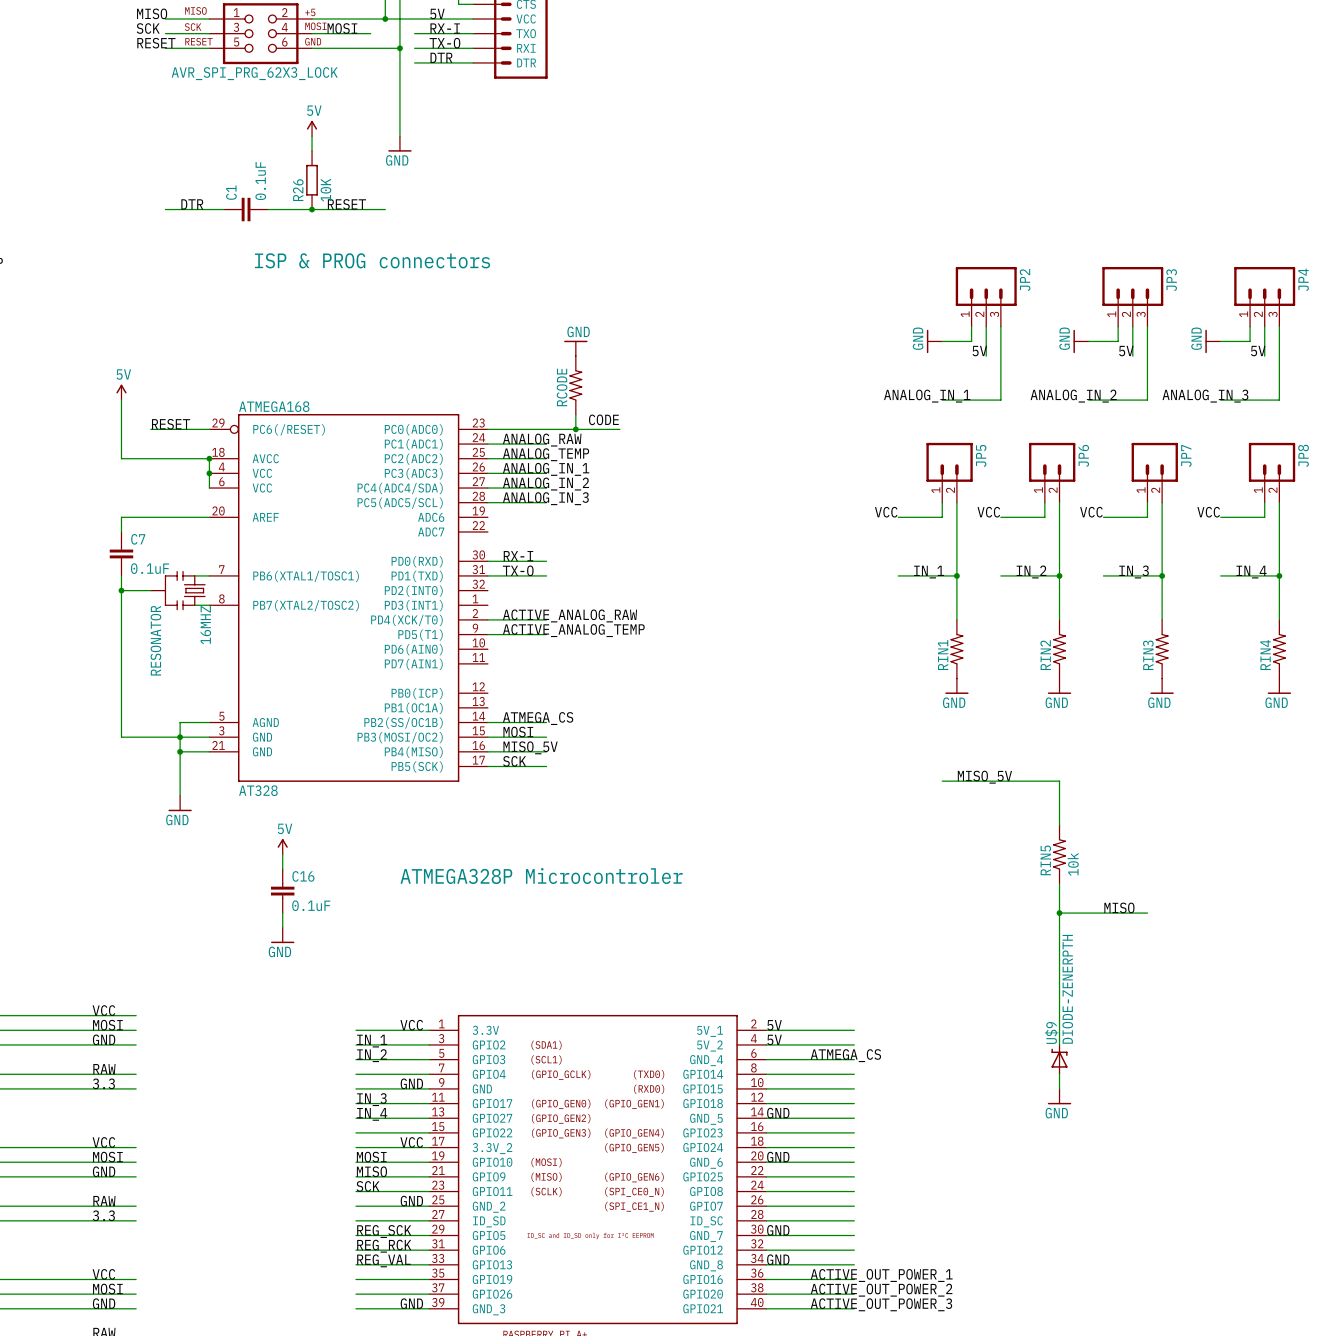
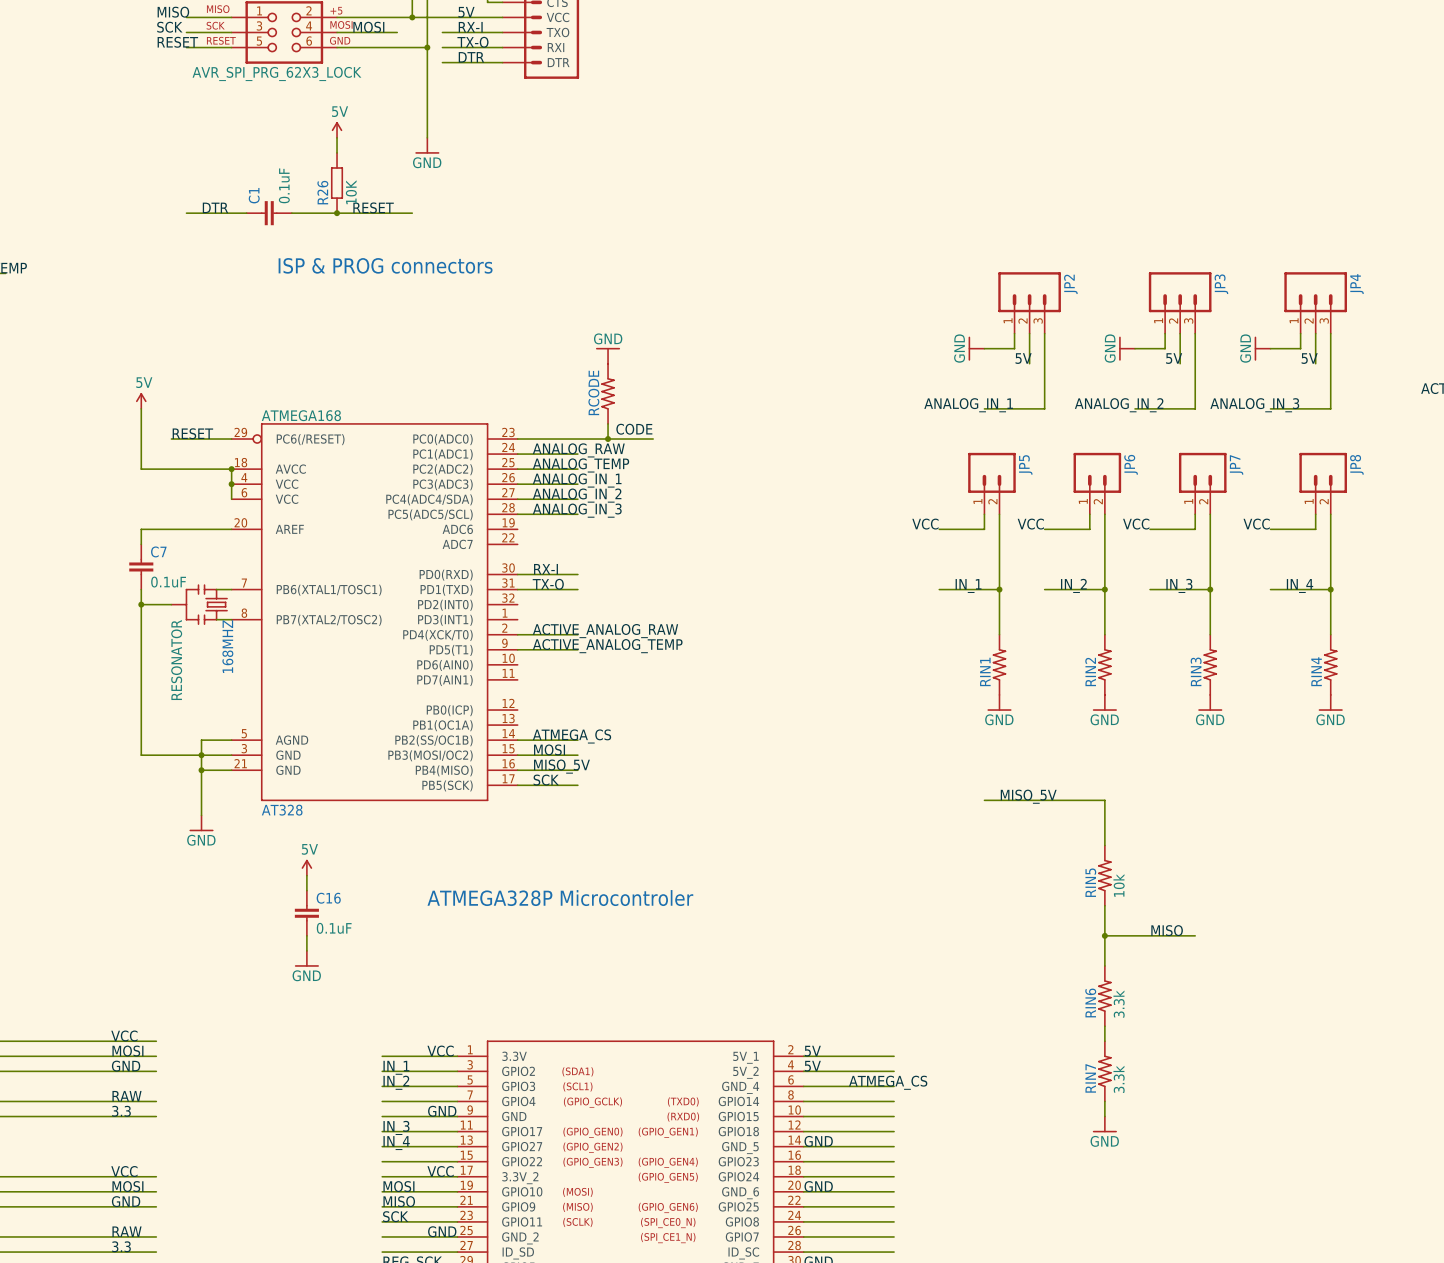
16MHZ name: 16MHZ (205, 625) -> 168MHZ (227, 646)
RIN6: none -> 3.3k (1104, 996)
RIN7: none -> 3.3k (1104, 1071)
U$9: DIODE-ZENERPTH (1059, 1059) -> none

